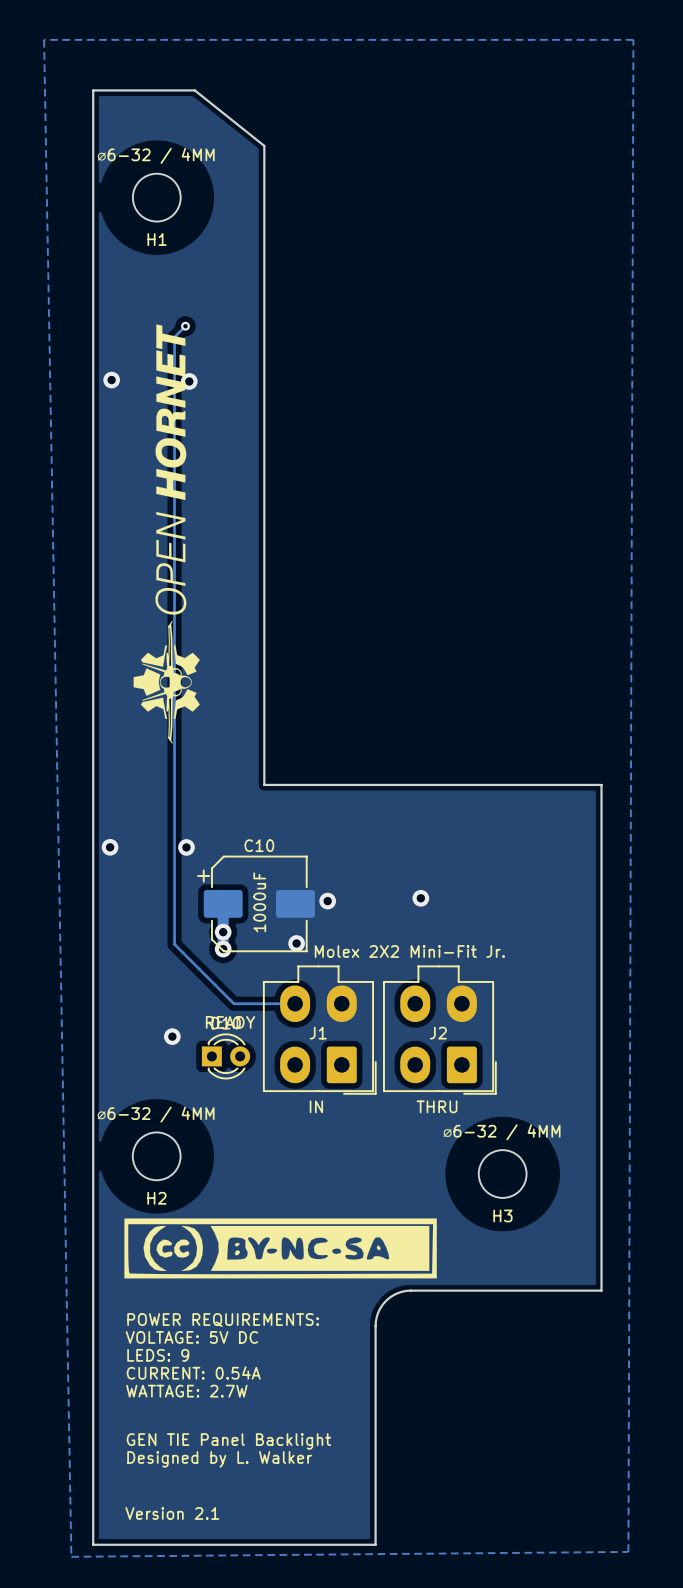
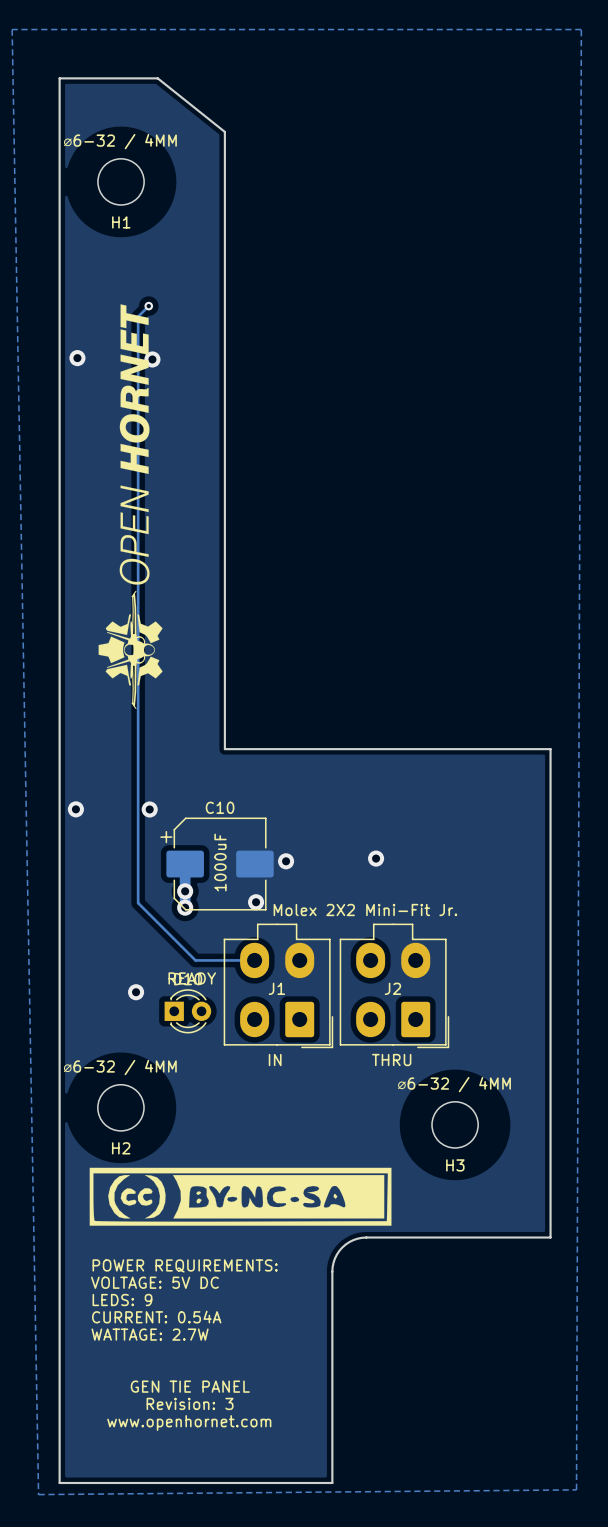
text: GEN TIE Panel Backlight (228, 1441) -> none
text: none -> GEN TIE PANEL (190, 1386)
text: Designed by L. Walker (219, 1459) -> none
text: none -> Revision: 3 (190, 1403)
text: none -> www.openhornet.com (189, 1423)
text: Version 2.1 (172, 1513) -> none

